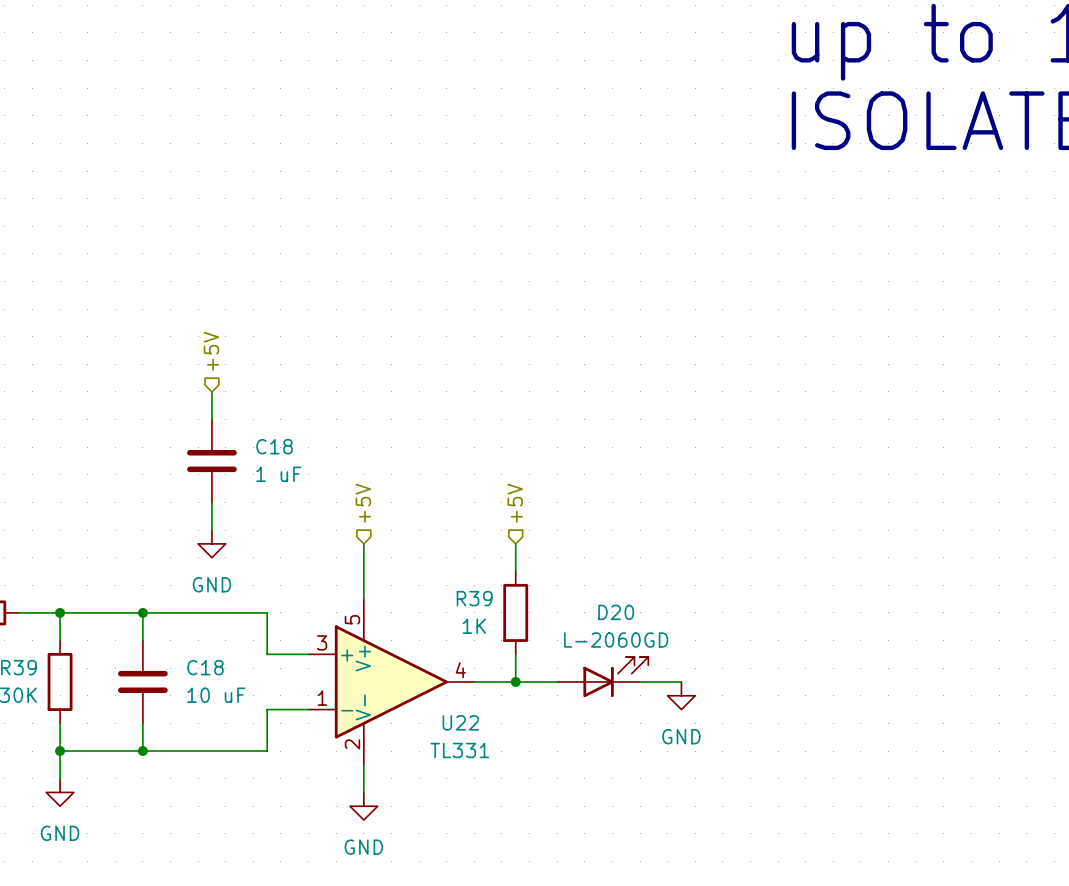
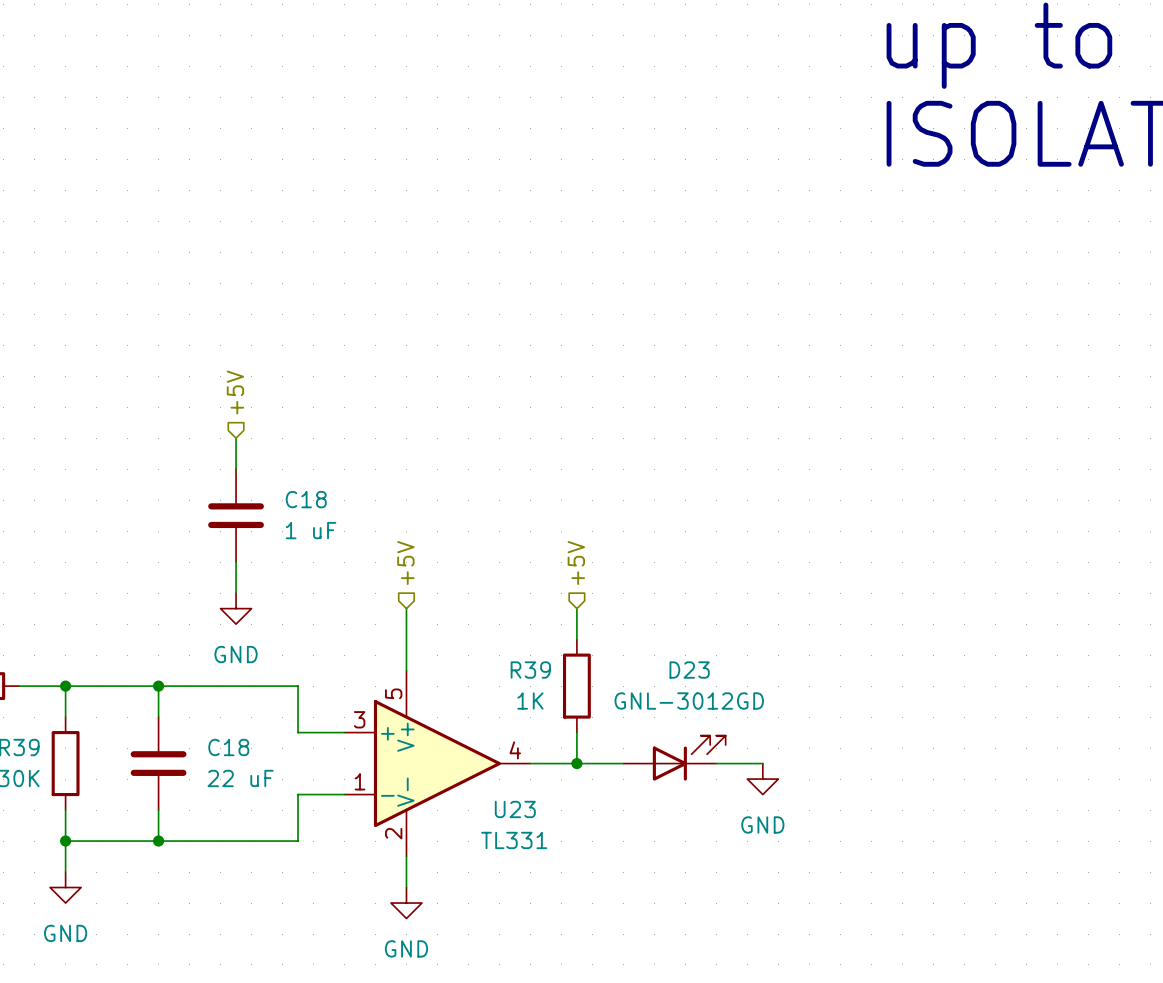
D20 name: D20 (616, 612) -> D23 (689, 670)
D20 value: L-2060GD (616, 640) -> GNL-3012GD (689, 701)
C18 value: 10 uF (216, 695) -> 22 uF (240, 778)
U22 name: U22 (460, 722) -> U23 (515, 809)

